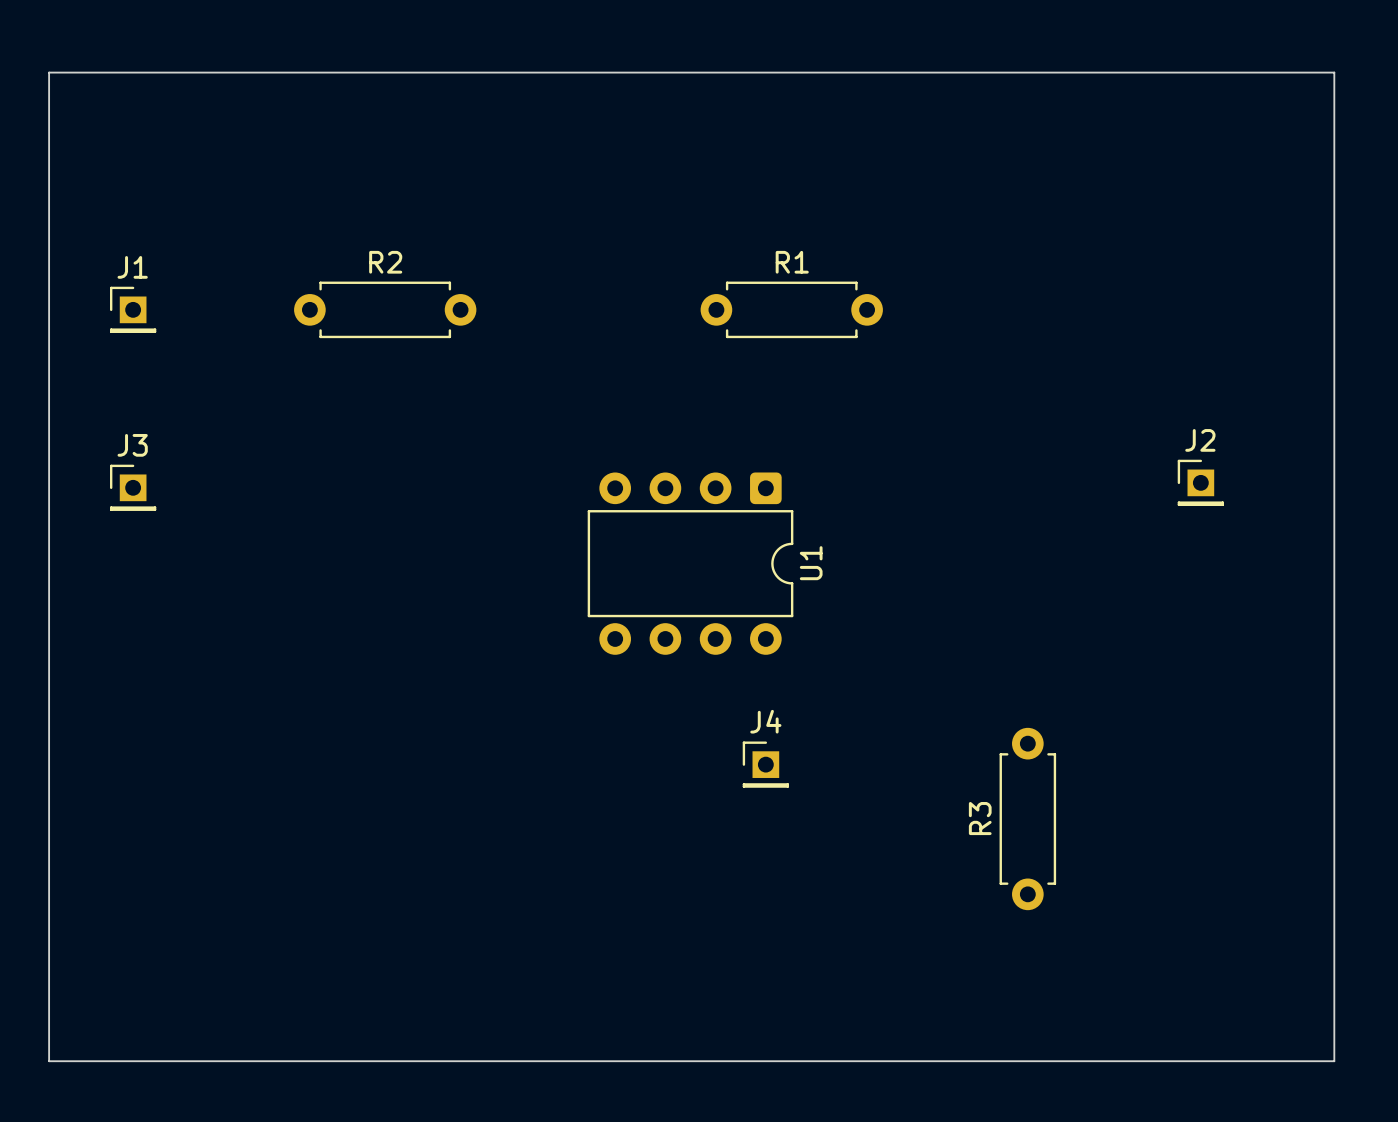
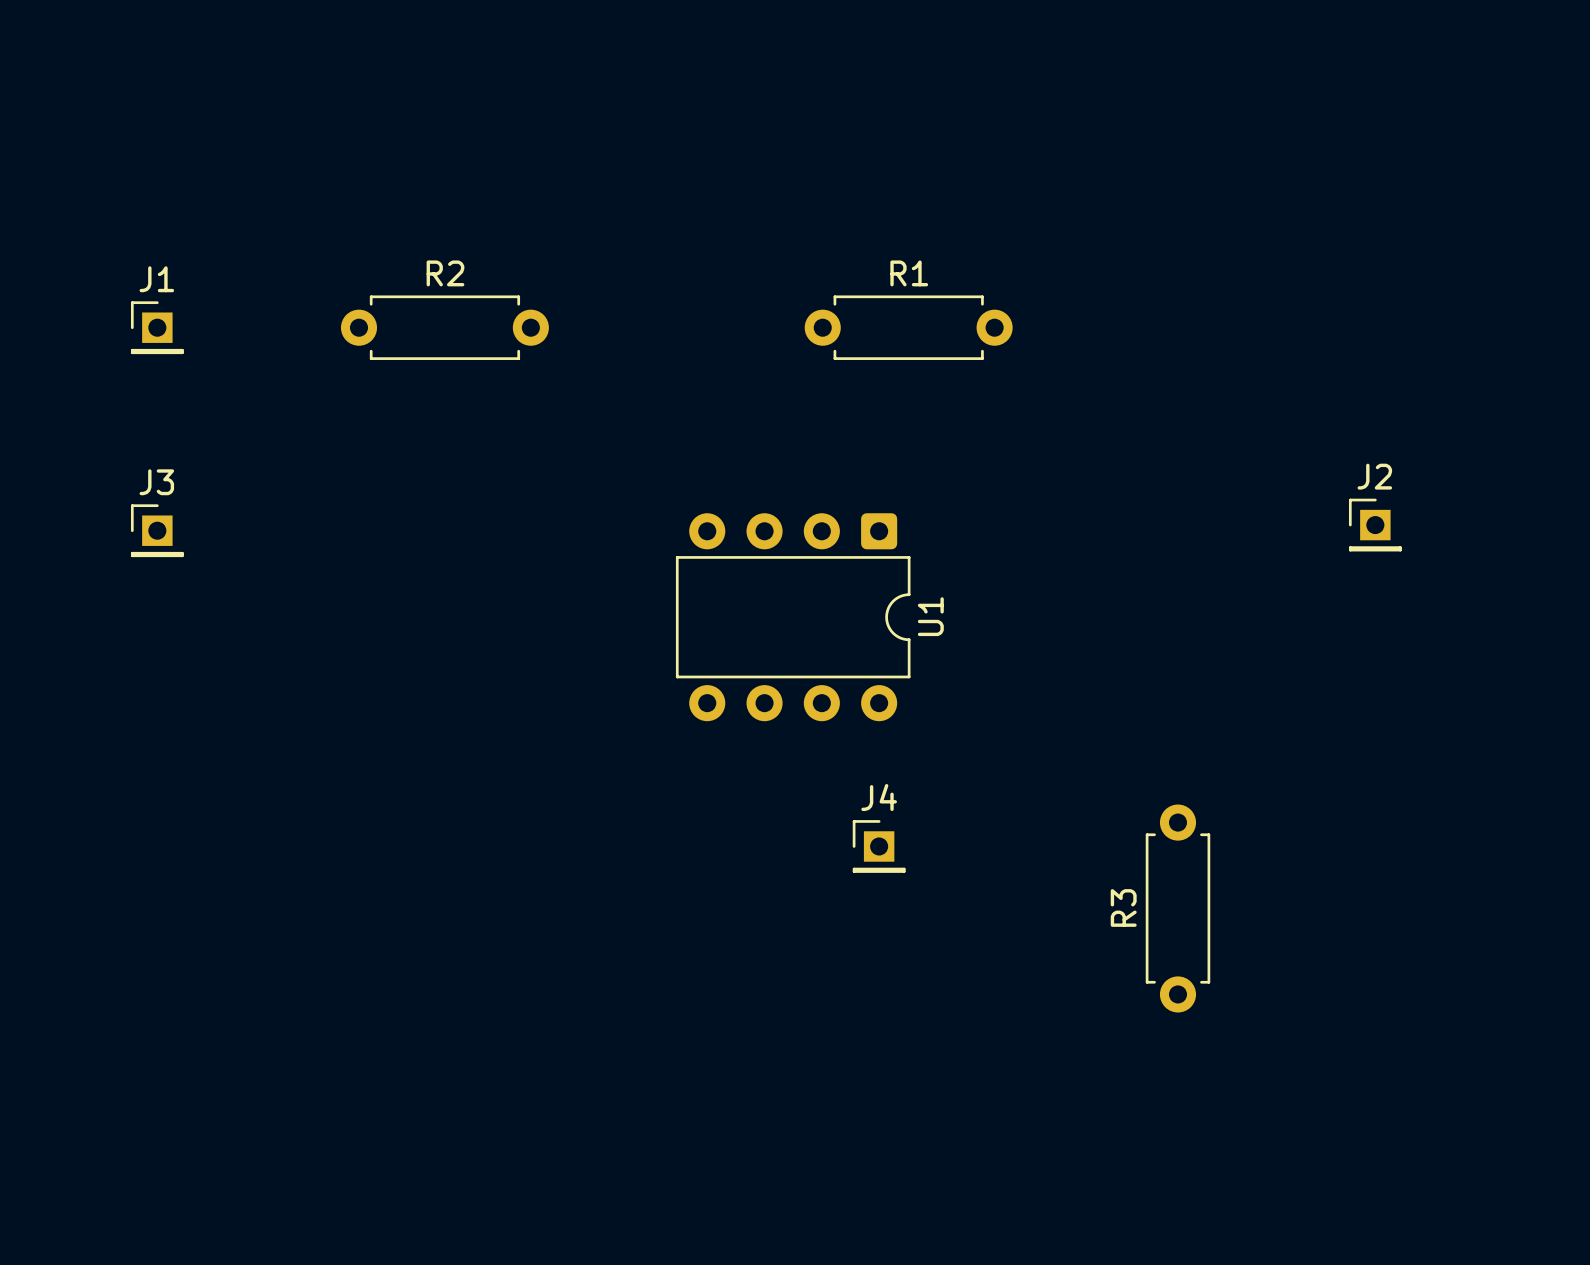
board edge: (49, 72) (1334, 72) (1334, 1061) (49, 1061) (49, 72) -> none

